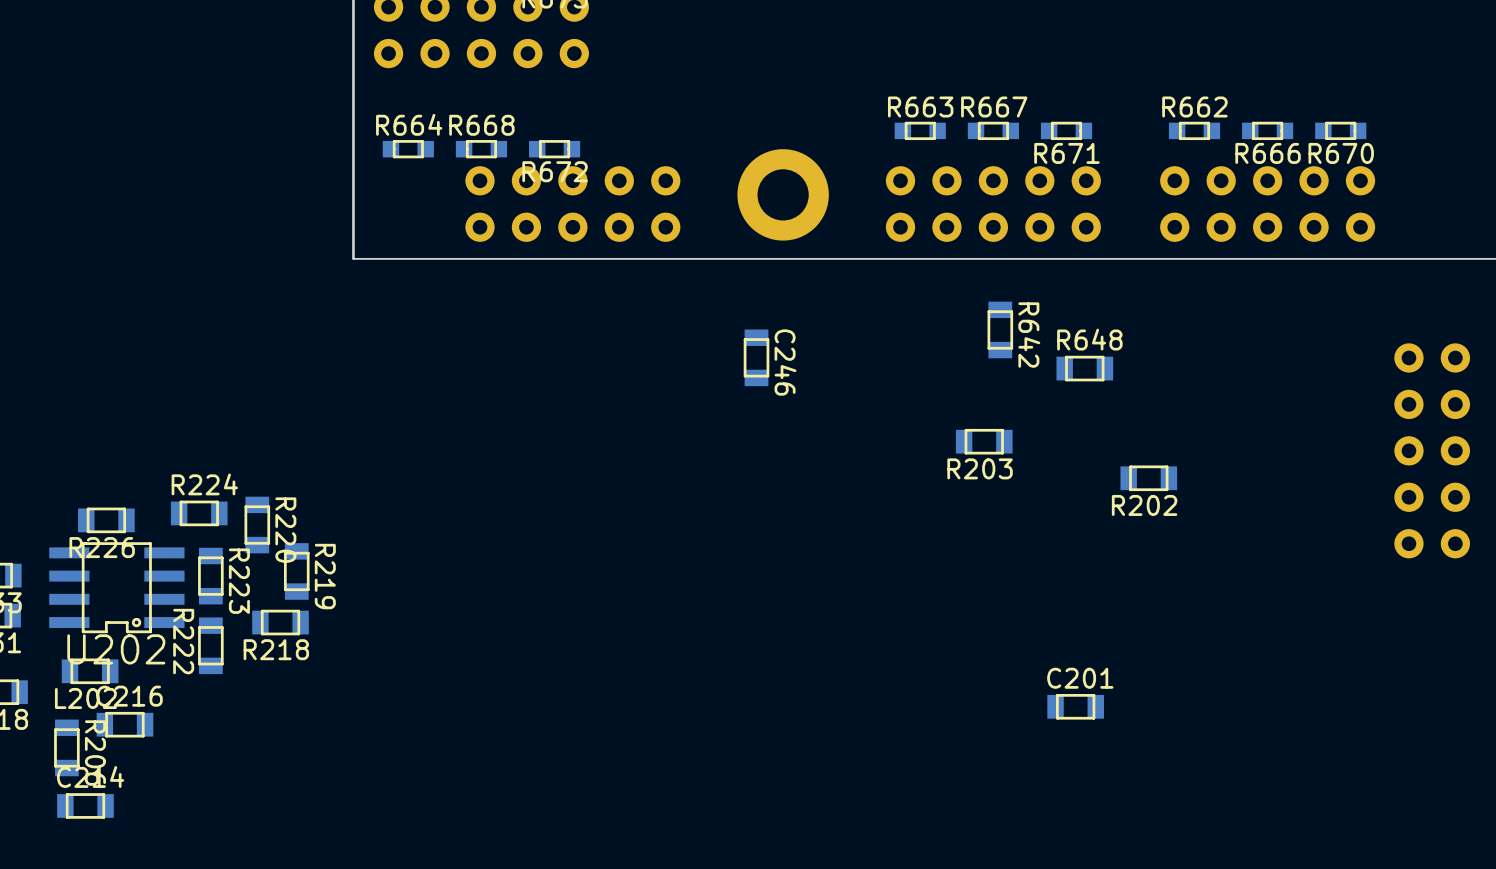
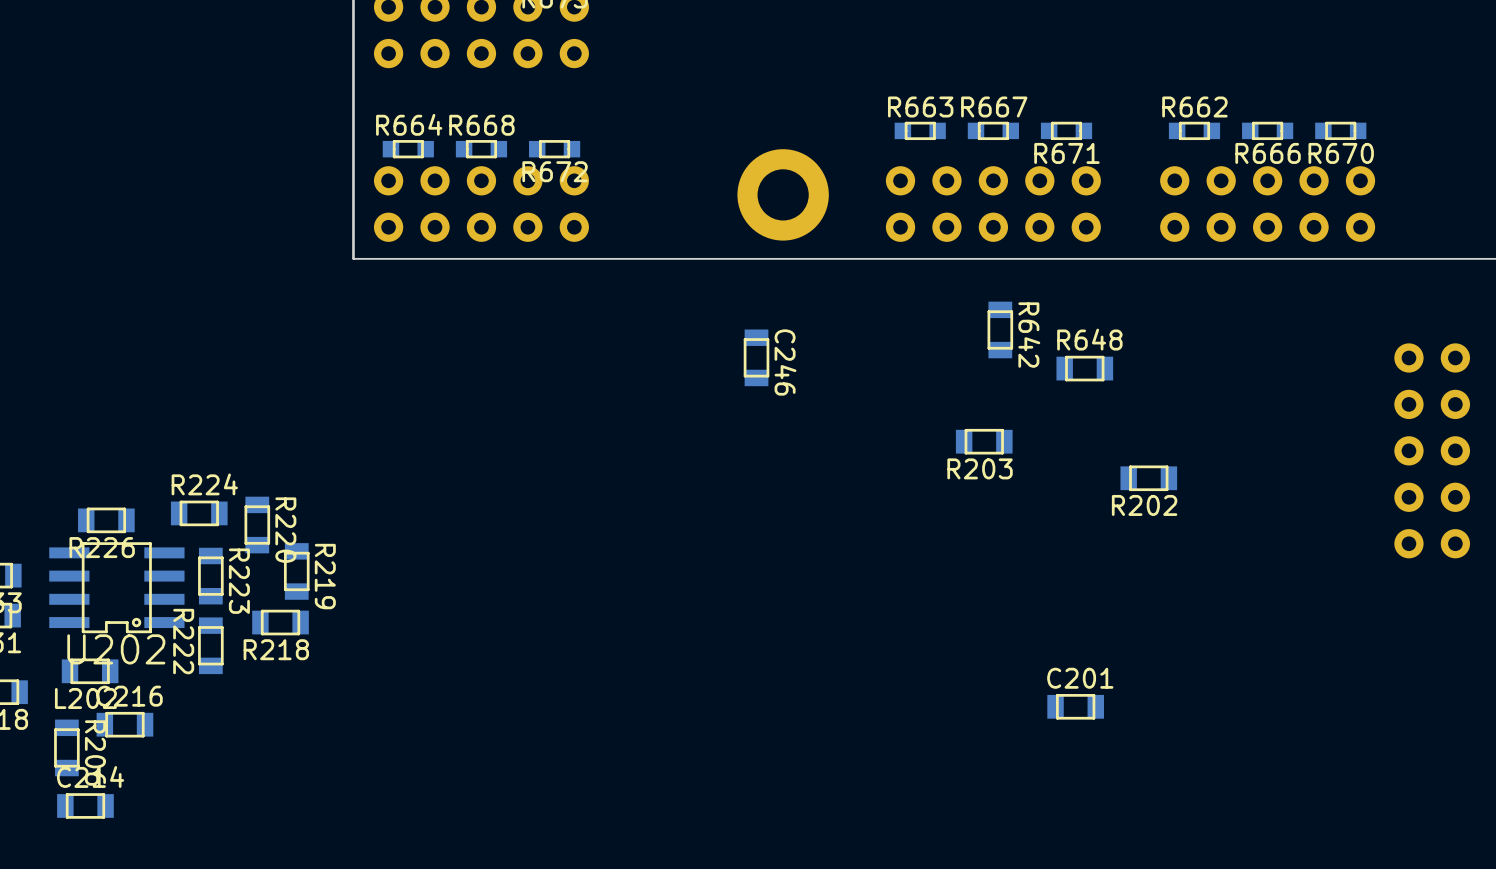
part position: (572, 204) -> (481, 204)

